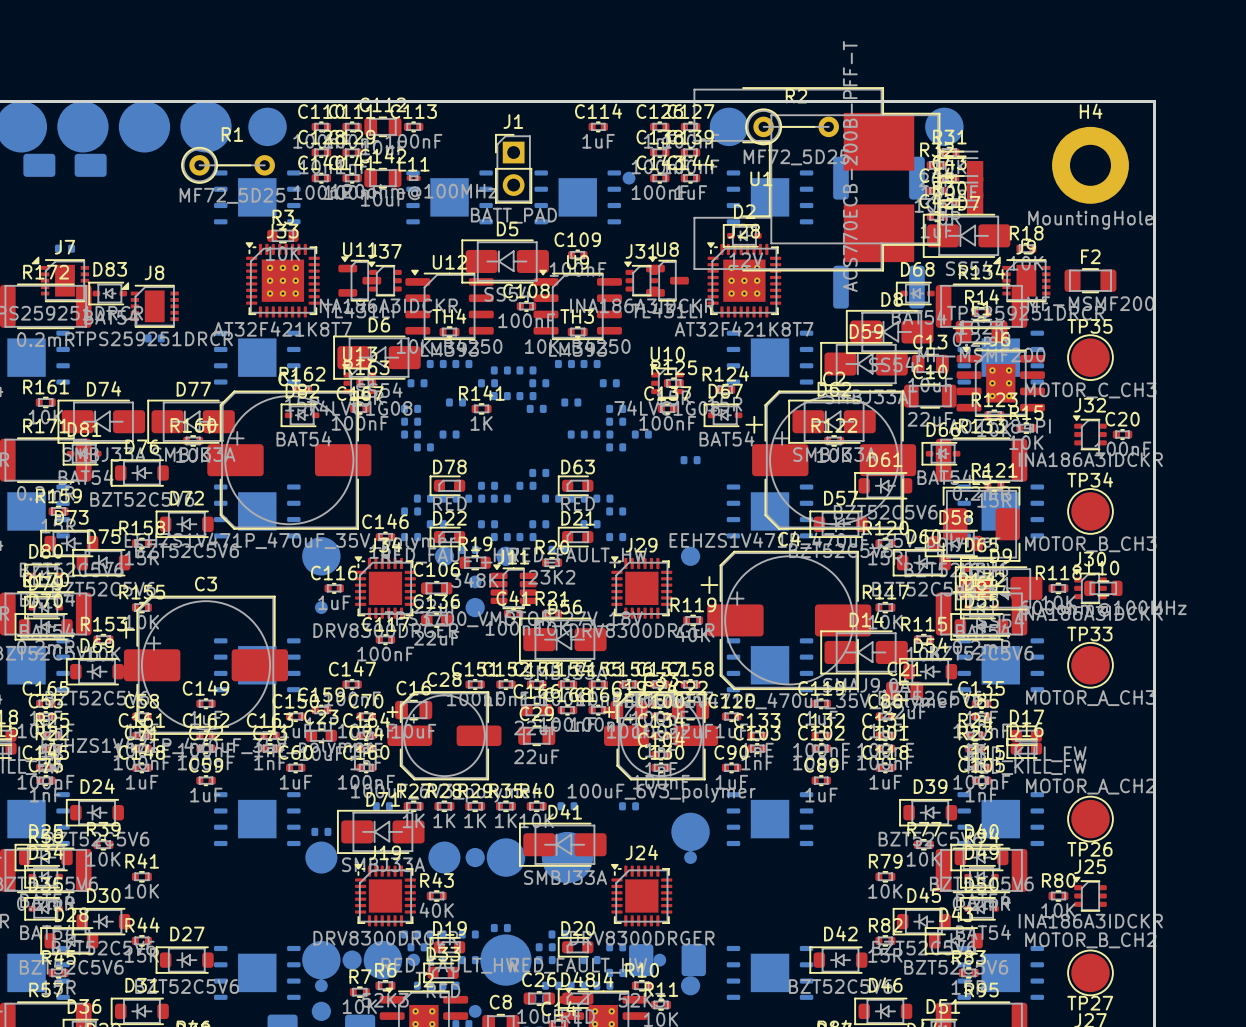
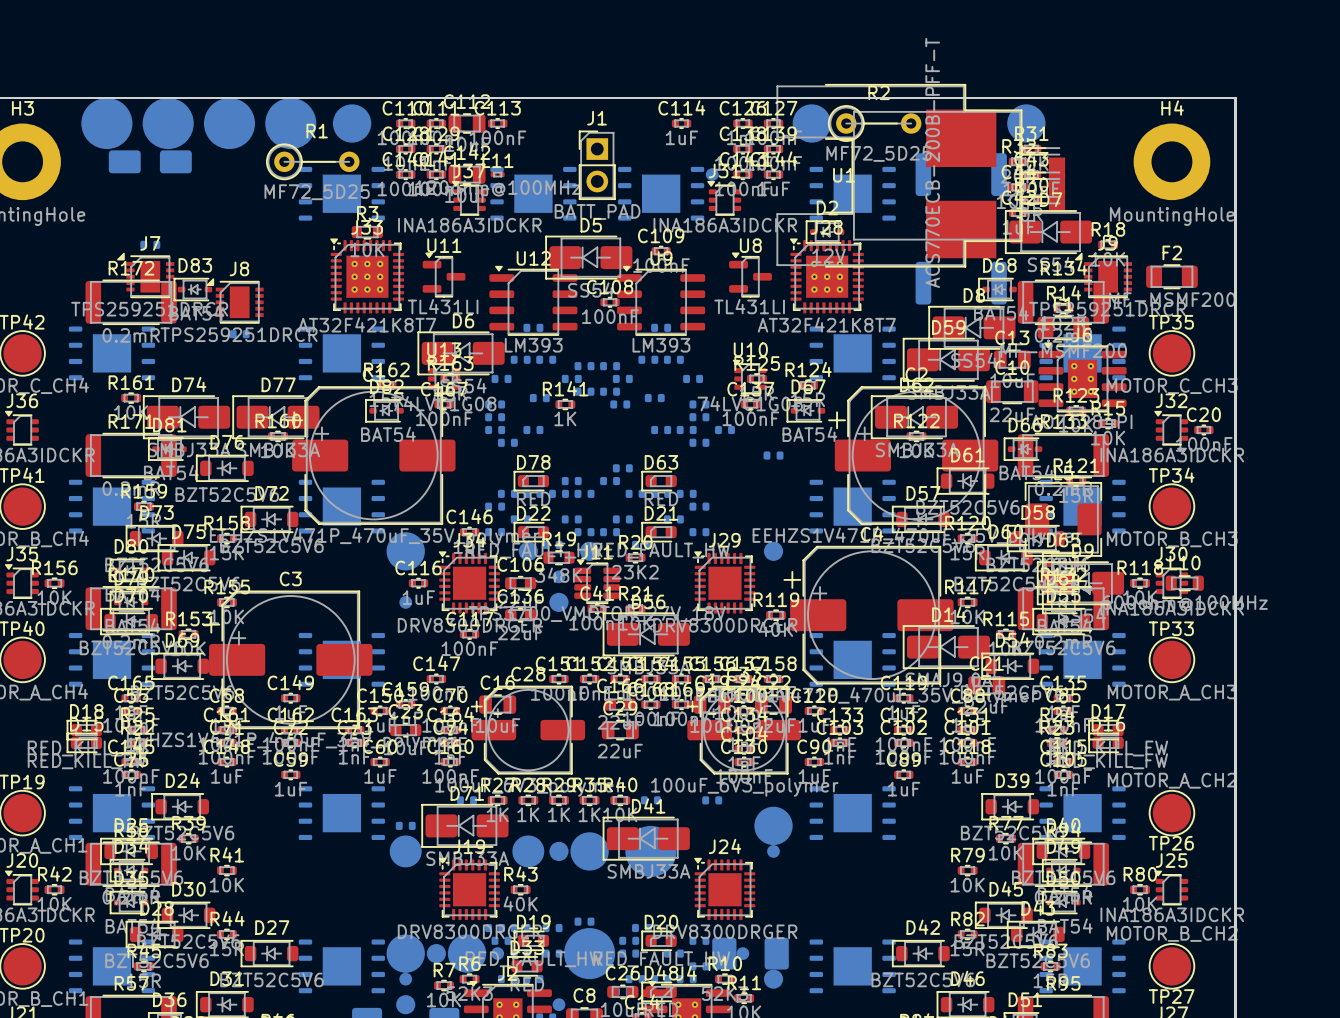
J37 position: (384, 278) -> (468, 198)
J31 position: (641, 278) -> (724, 198)
TH4 side: top (449, 331) -> bottom (533, 327)
TH3 side: top (577, 331) -> bottom (661, 327)

